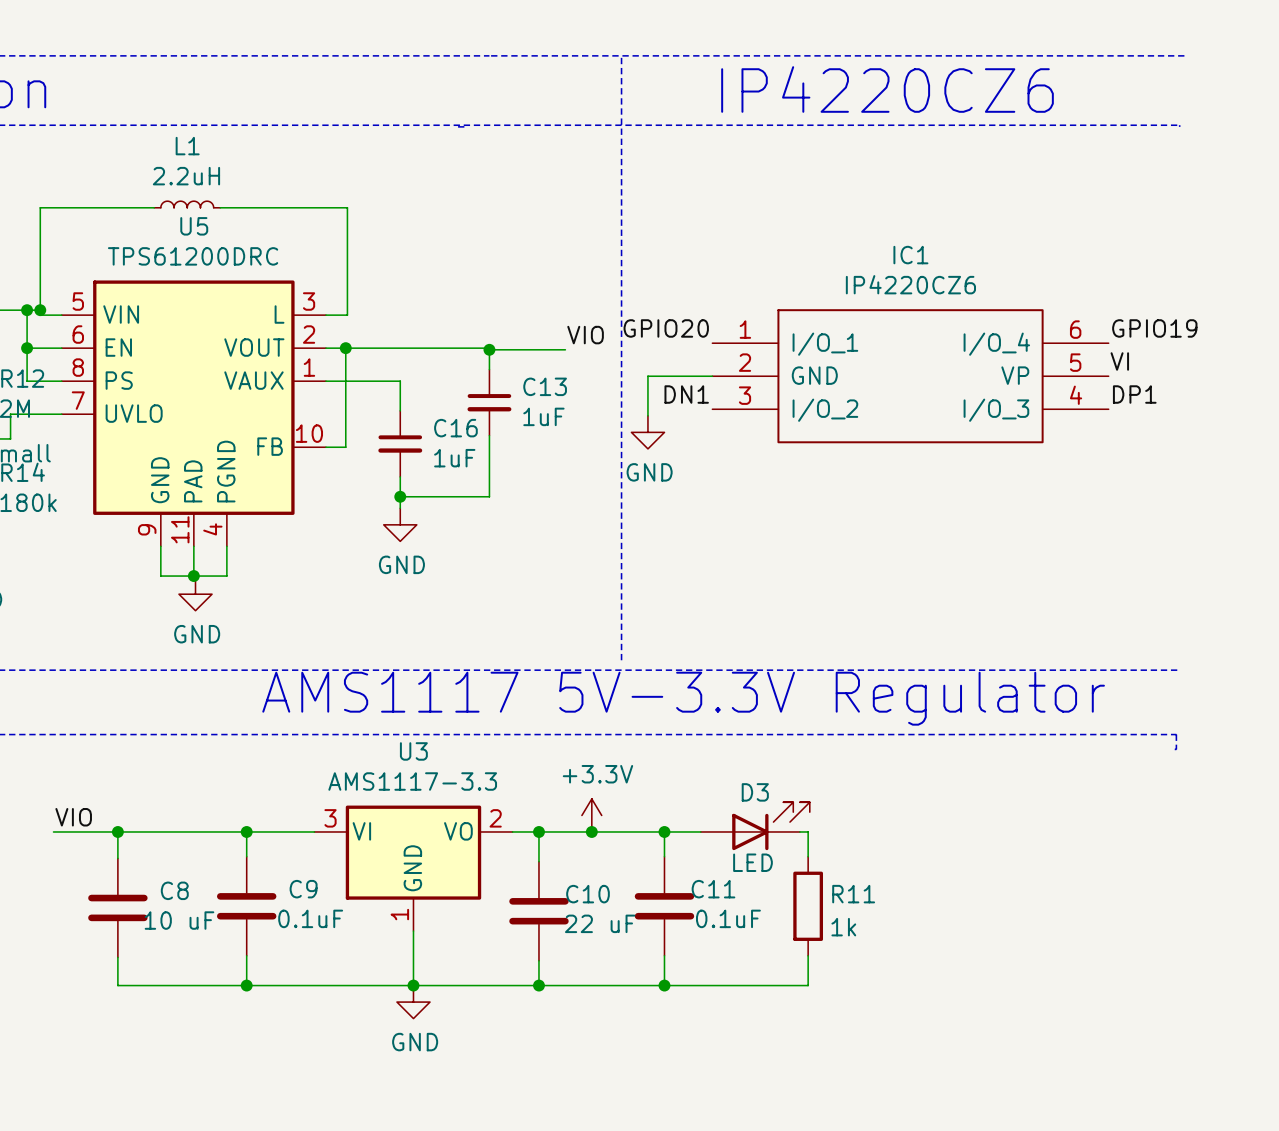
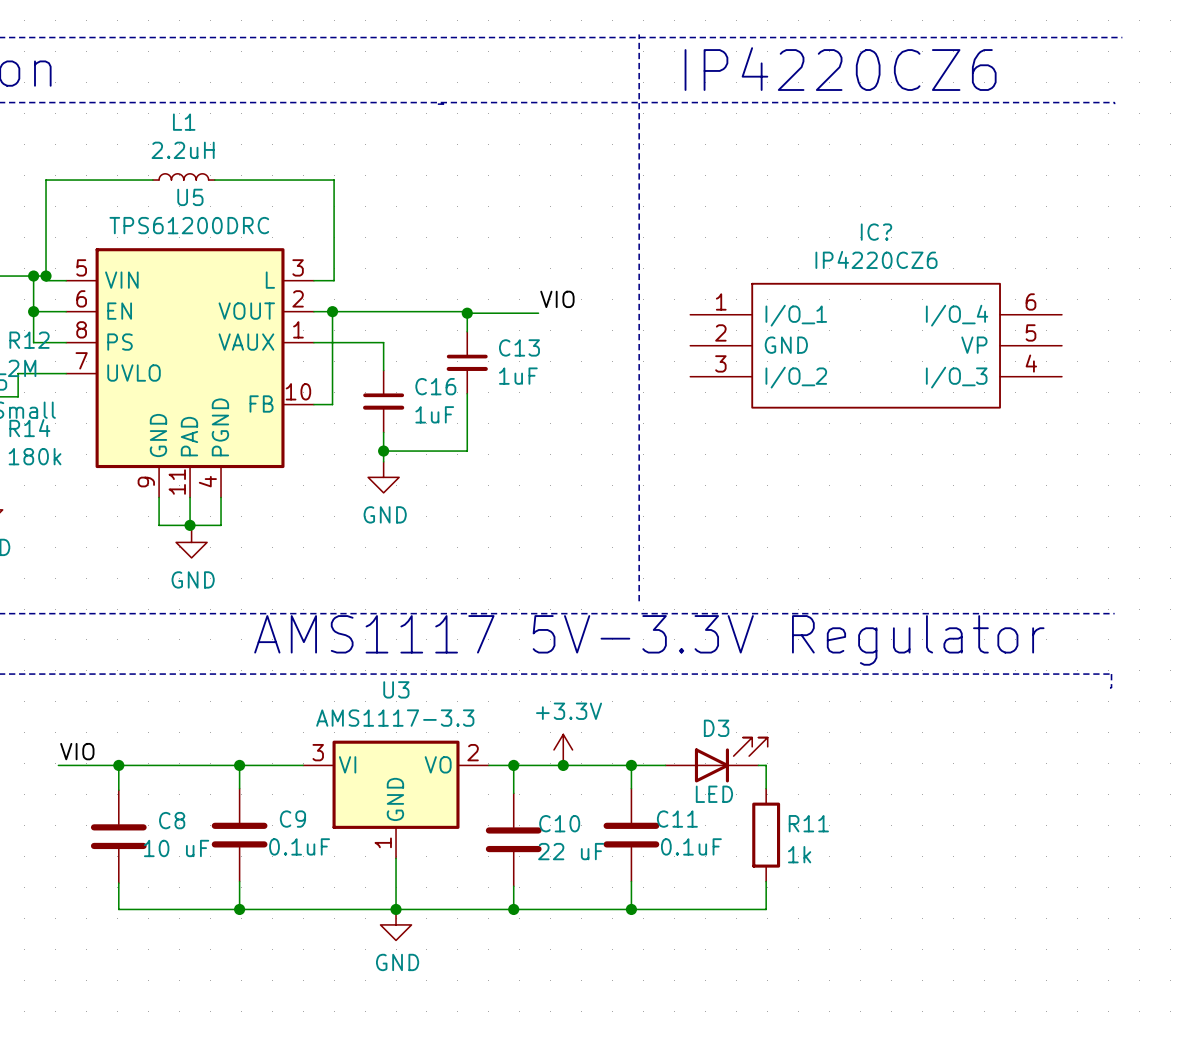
line: (621, 55) (621, 660) -> (639, 34) (639, 601)
label: GPIO20 (666, 328) -> none
label: GPIO19 (1154, 328) -> none
label: VI (1119, 361) -> none
wire: (712, 376) (647, 376) (647, 415) -> none
IC1: IP4220CZ6 (910, 376) -> none
IC?: none -> IP4220CZ6 (876, 345)
label: DN1 (686, 394) -> none
label: DP1 (1134, 394) -> none
power symbol: GND (647, 432) -> none

